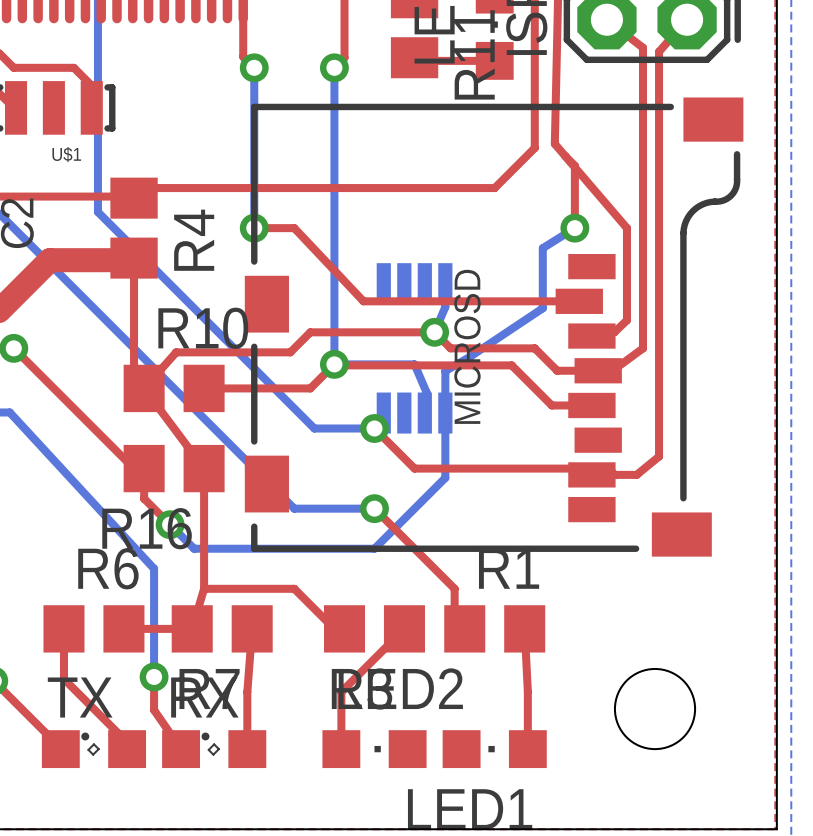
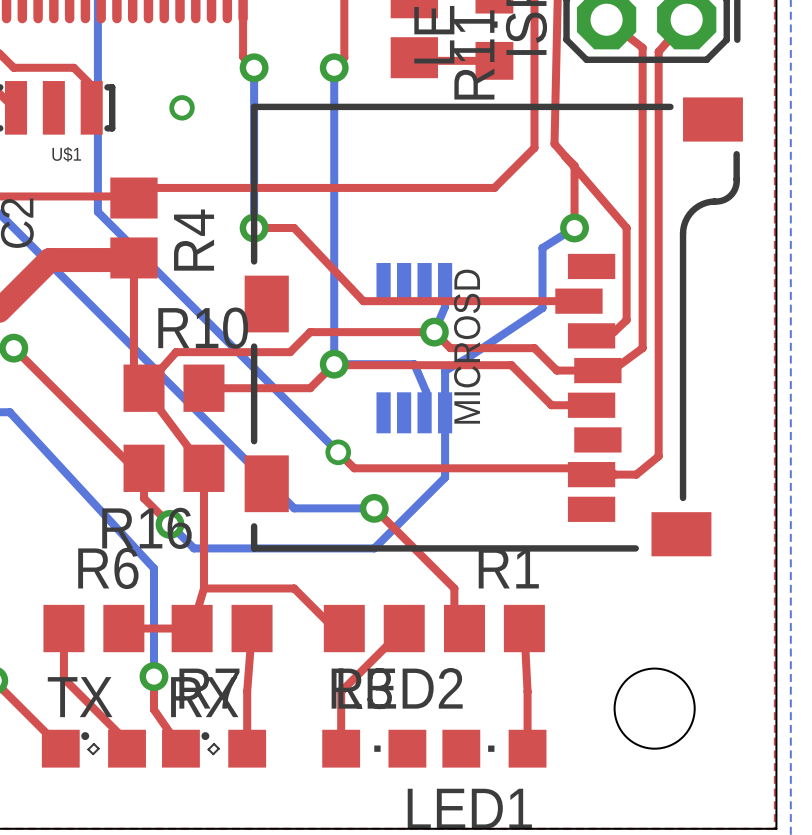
via: none -> (182, 107)
bottom track: (314, 428) (374, 428) -> (314, 428) (338, 452)
top track: (374, 428) (414, 468) -> (338, 452) (354, 468) (414, 468)
via: (374, 428) -> none
via: none -> (338, 452)

